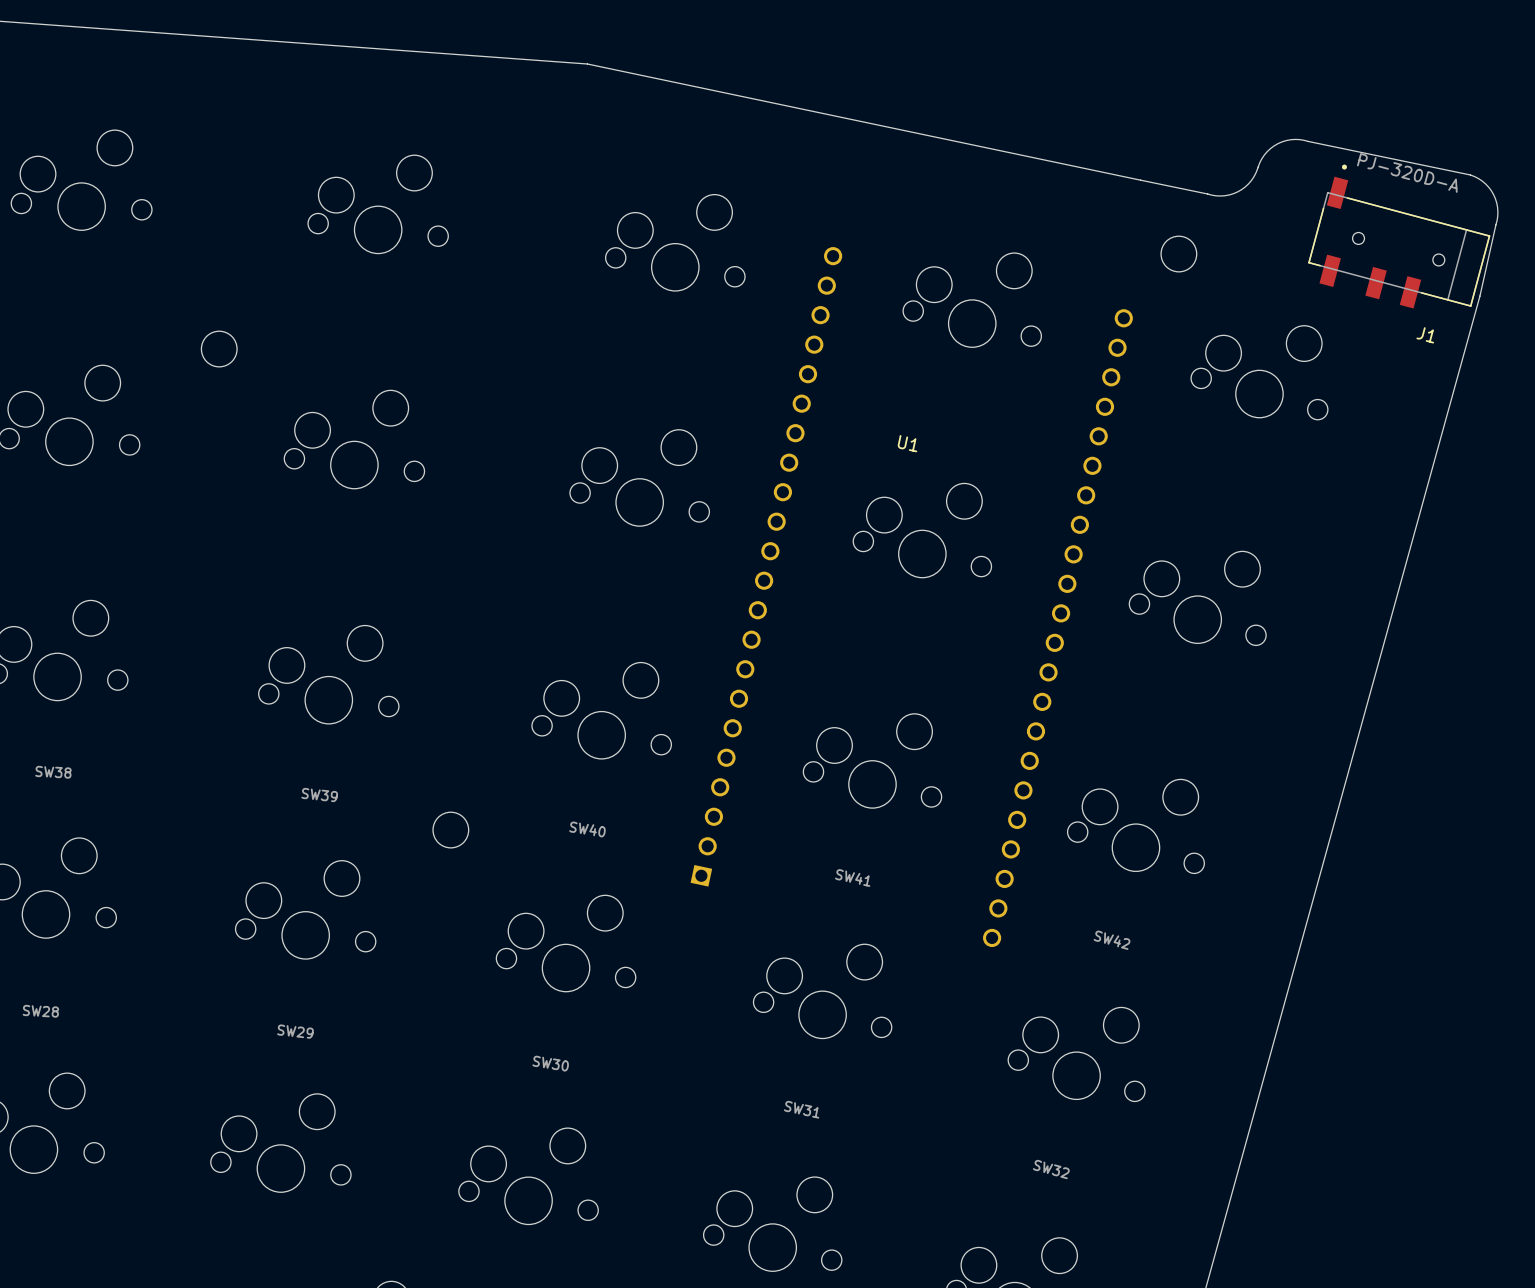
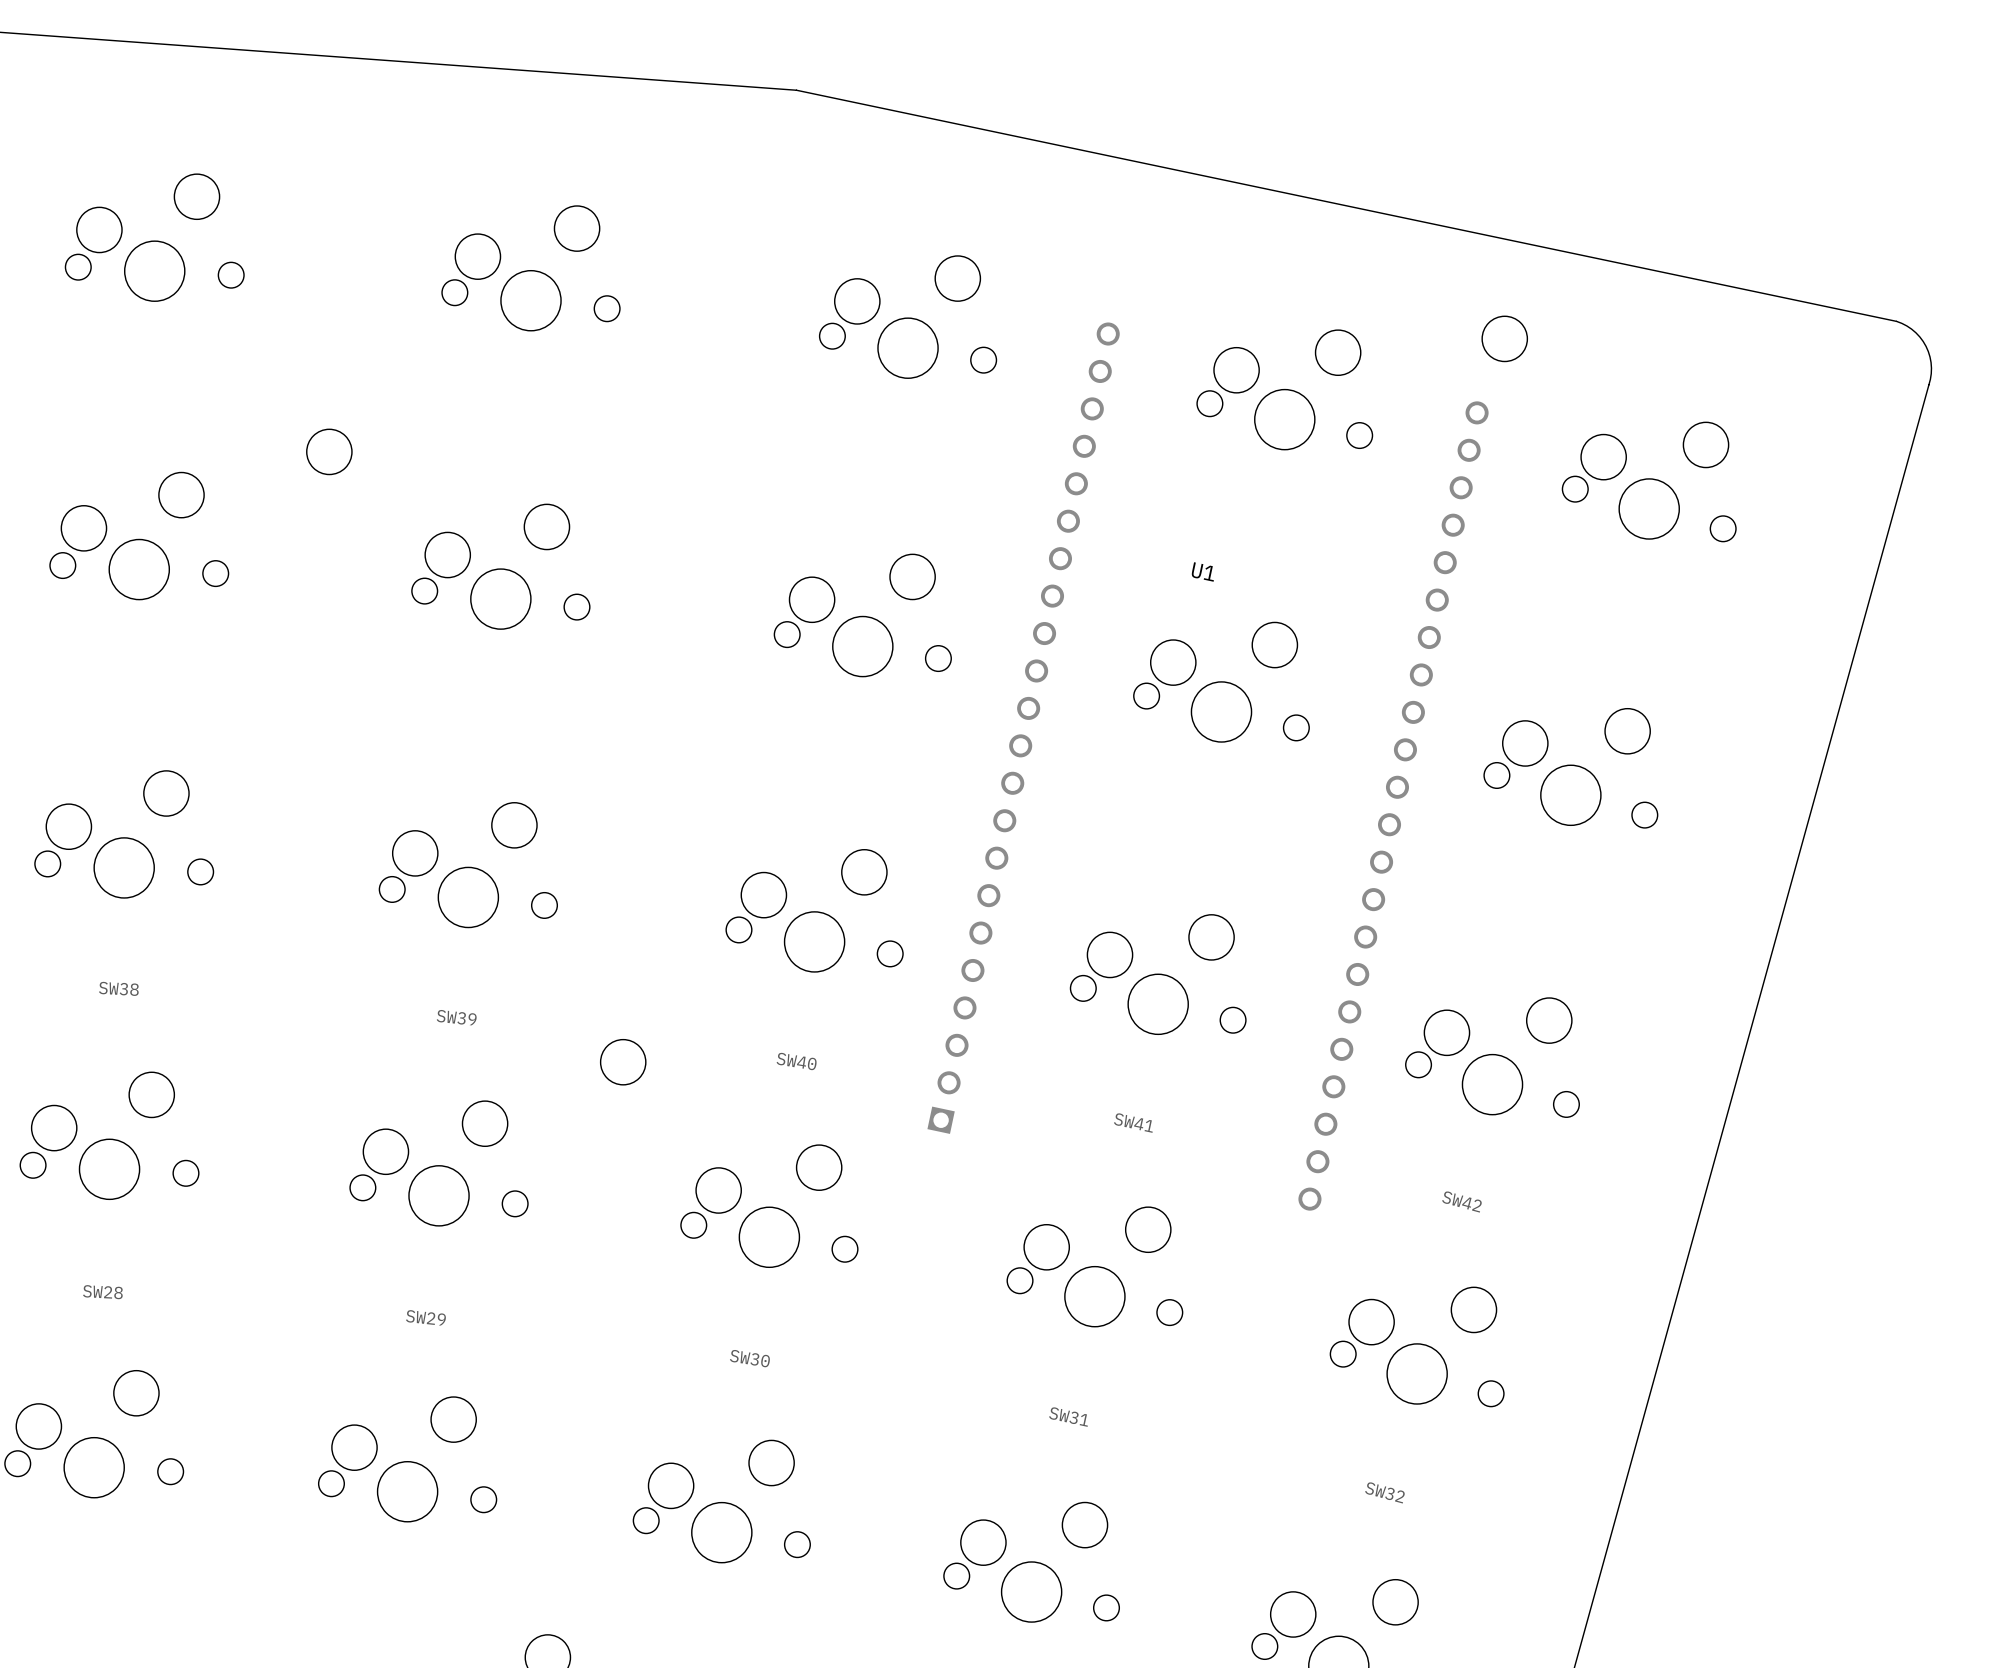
board edge: (587, 64) (1216, 195) (1233, 193) (1245, 186) (1253, 176) (1267, 151) (1277, 143) (1290, 139) (1303, 140) (1470, 174) (1478, 178) (1488, 187) (1493, 194) (1497, 207) (1497, 220) (1479, 296) -> (796, 90) (1896, 321) (1911, 329) (1926, 346) (1931, 368) (1928, 384)
J1: PJ-320D-A (1399, 236) -> none
round board edge position: (1178, 254) -> (1504, 338)

